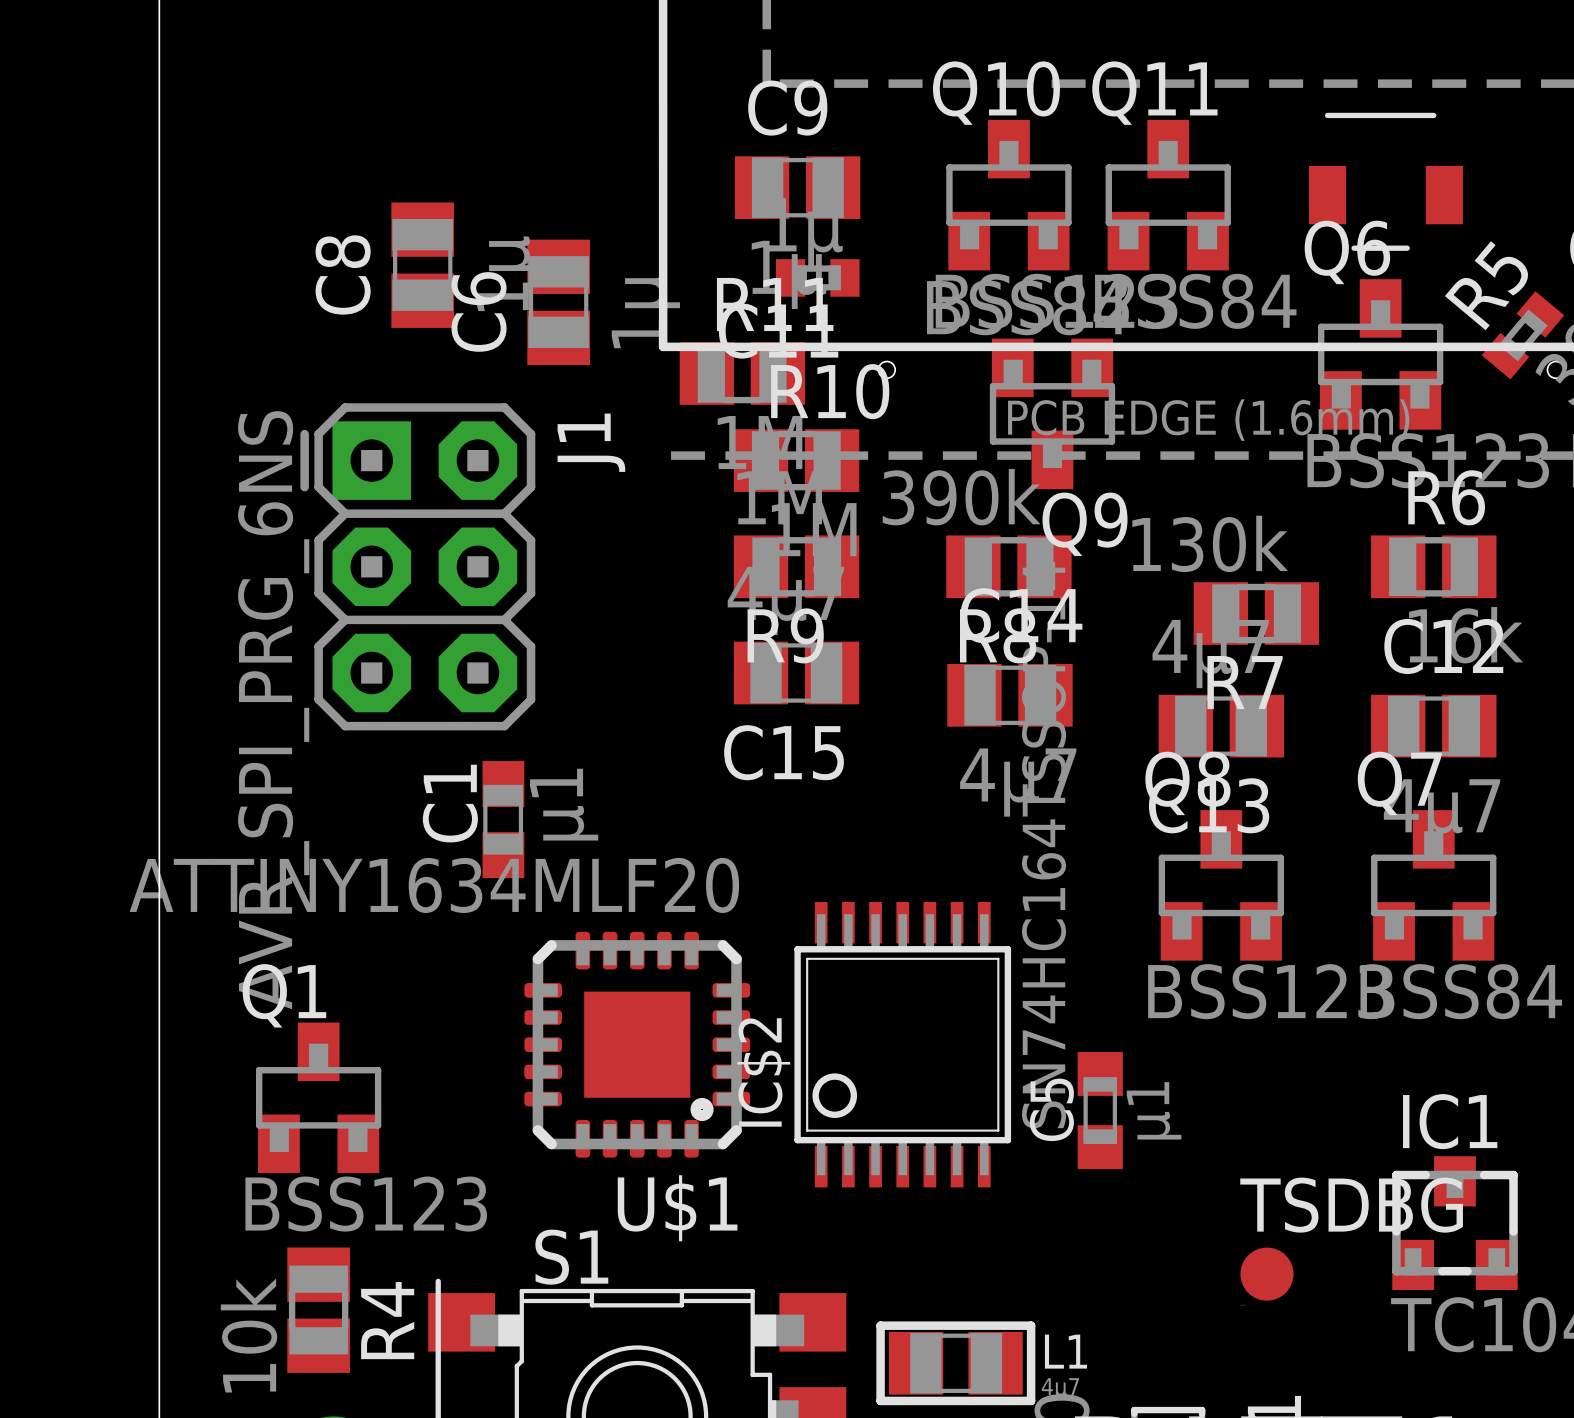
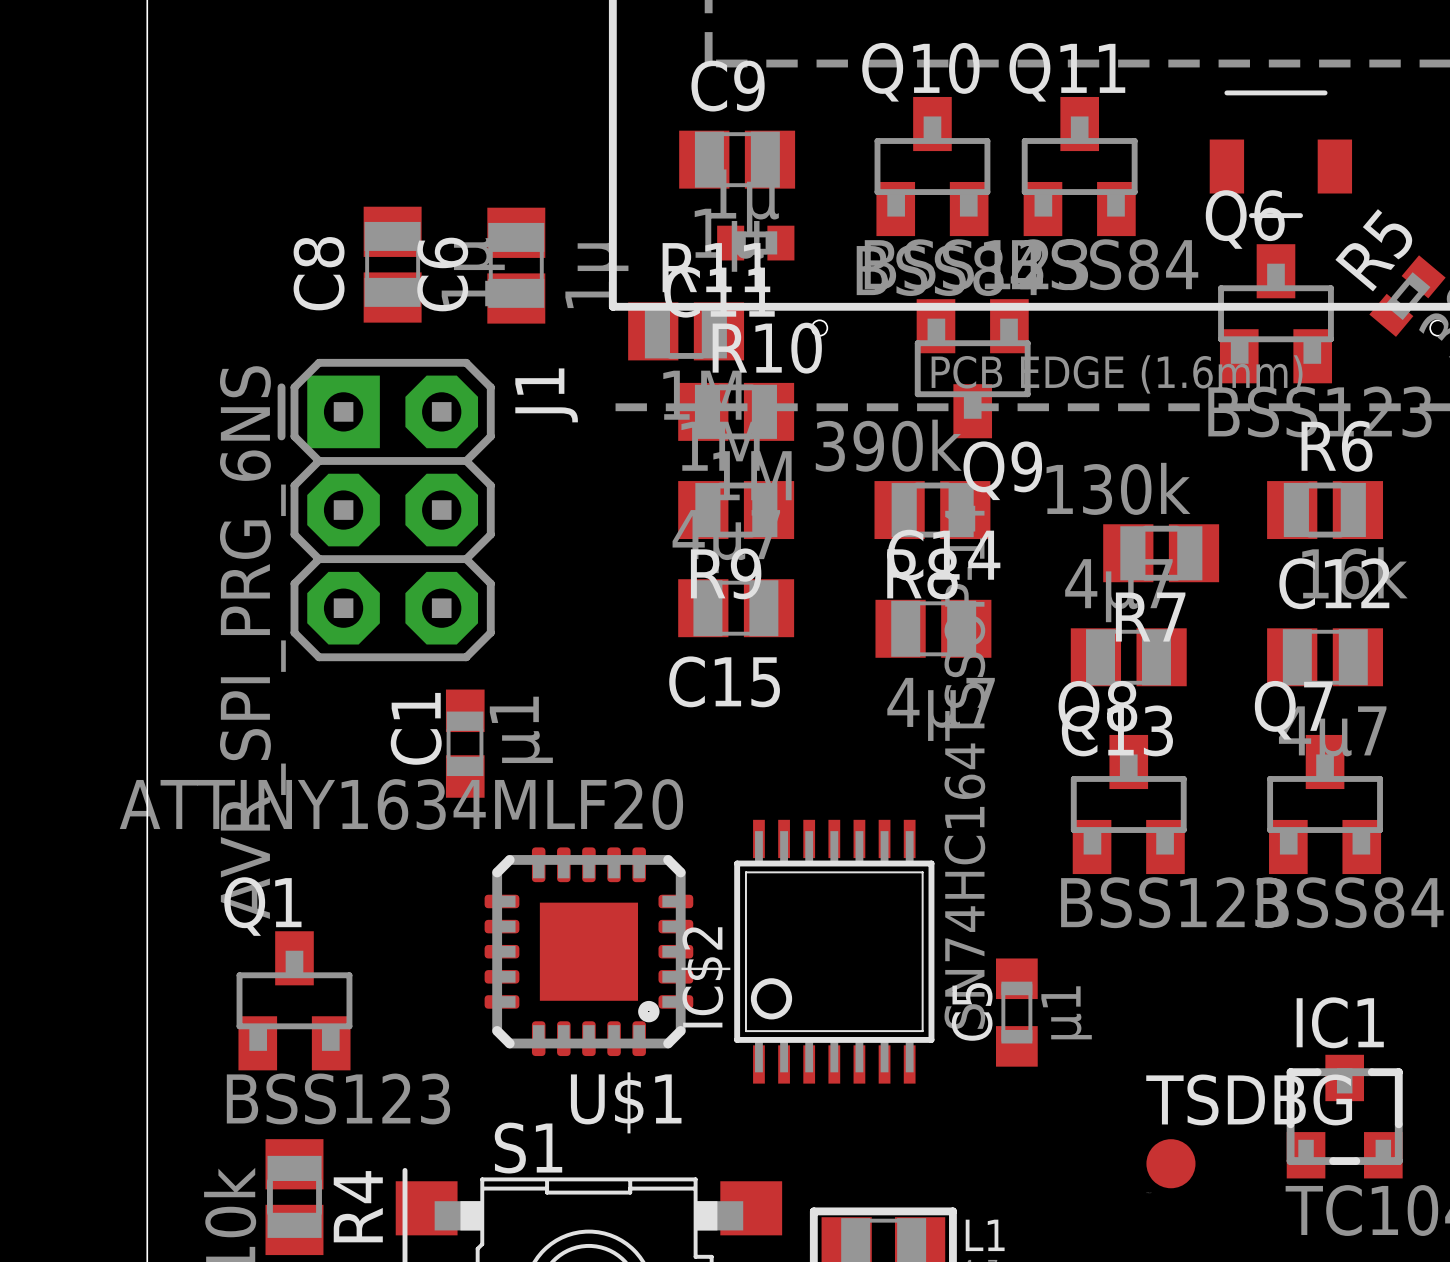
C8 position: (422, 265) -> (392, 264)

